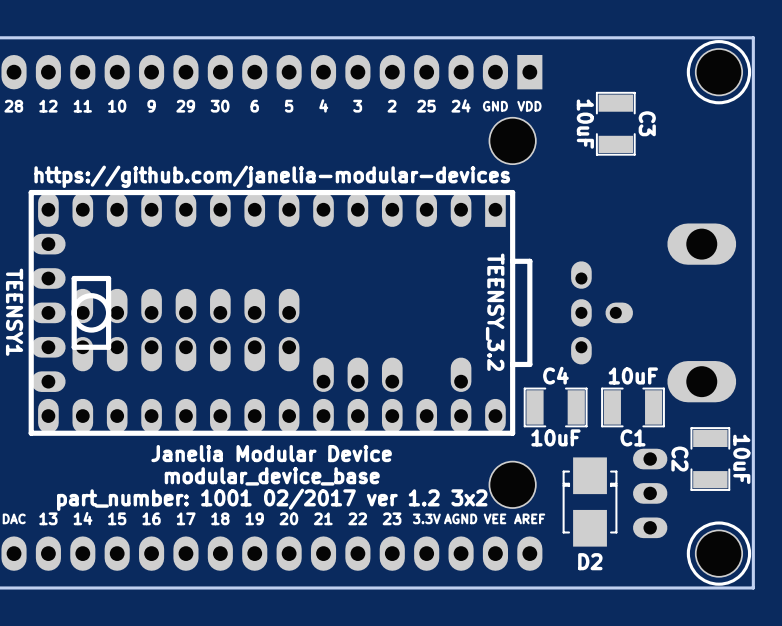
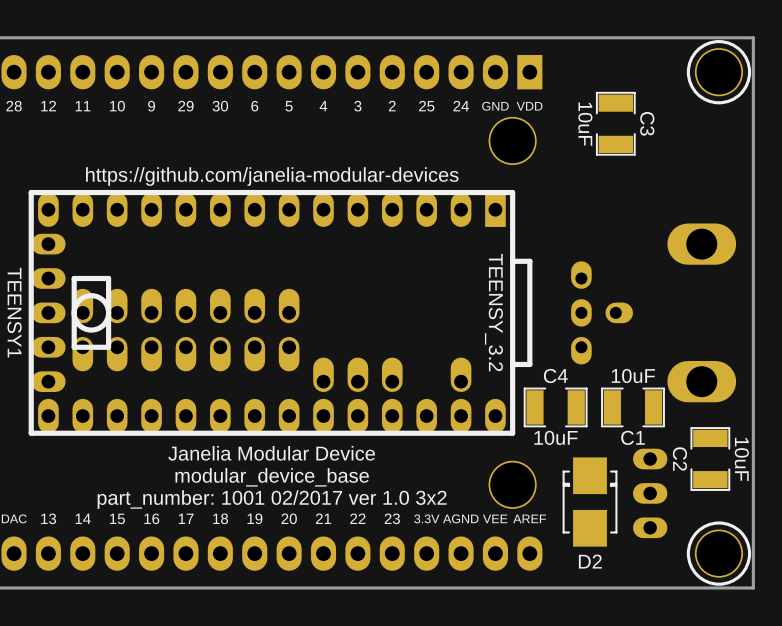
text: part_number: 1001 02/2017 ver 1.2 3x2 (272, 499) -> part_number: 1001 02/2017 ver 1.0 3x2 (272, 499)

